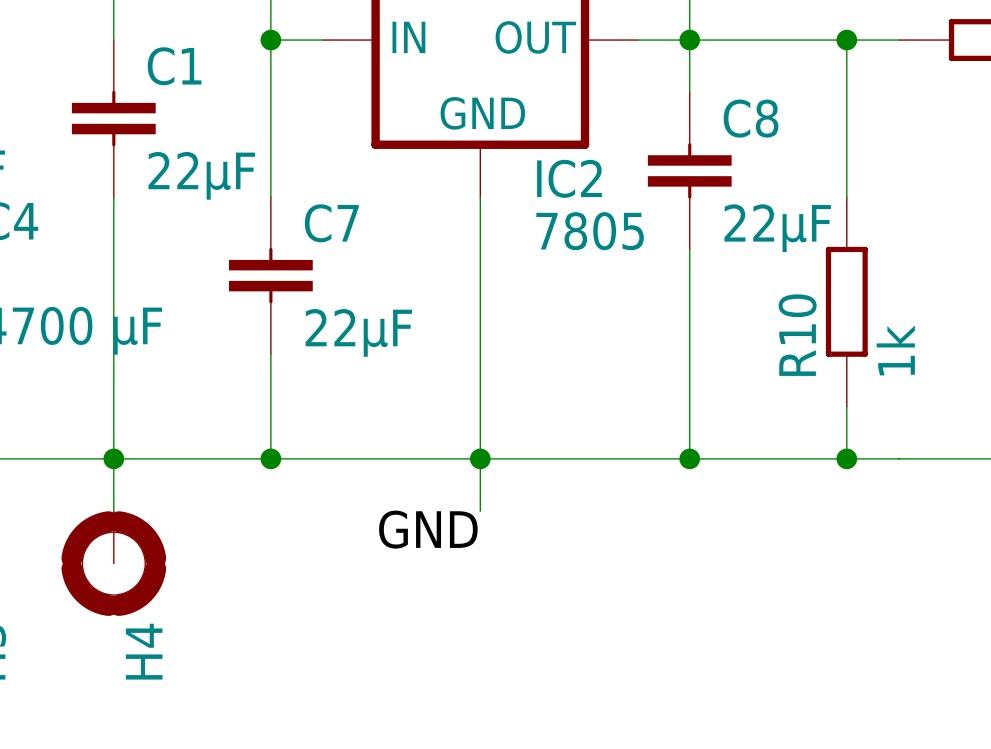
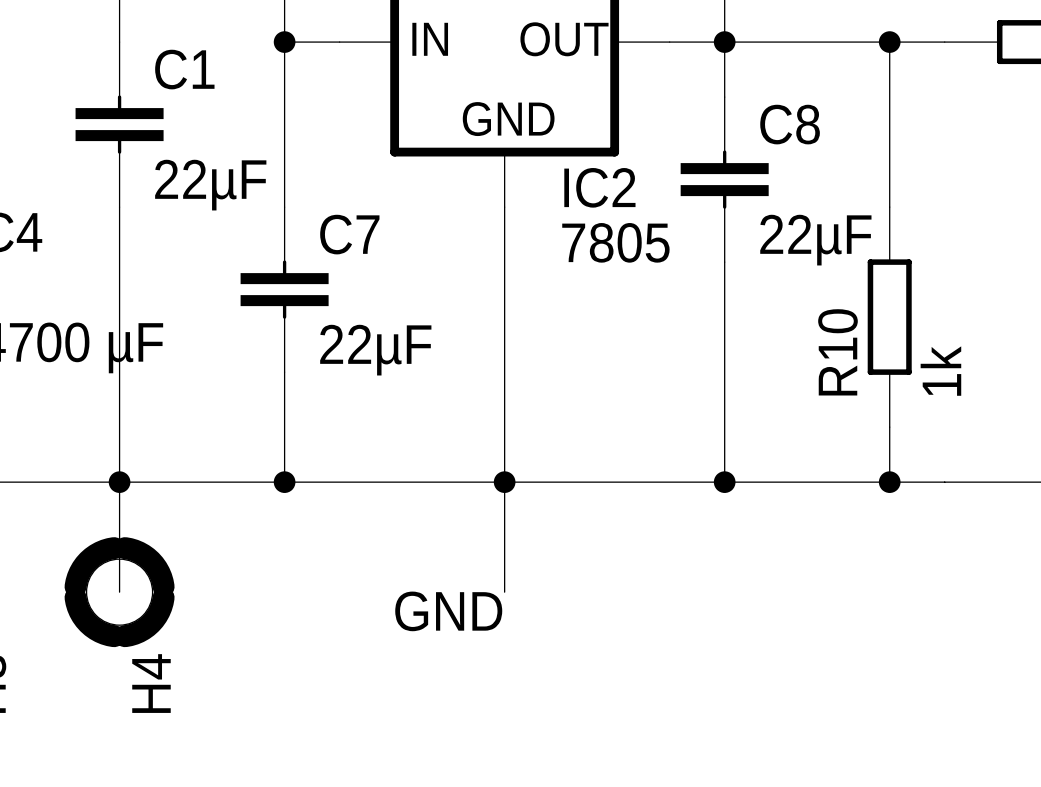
wire: none -> (504, 537) (504, 592)
label position: GND (428, 529) -> GND (448, 611)

